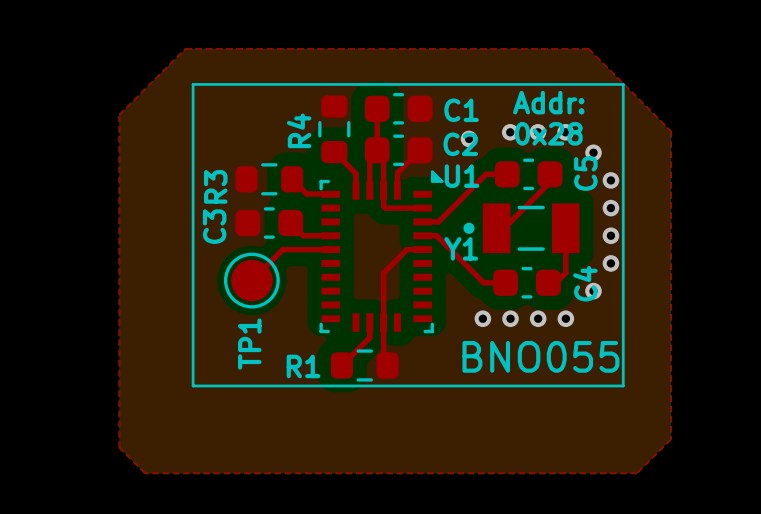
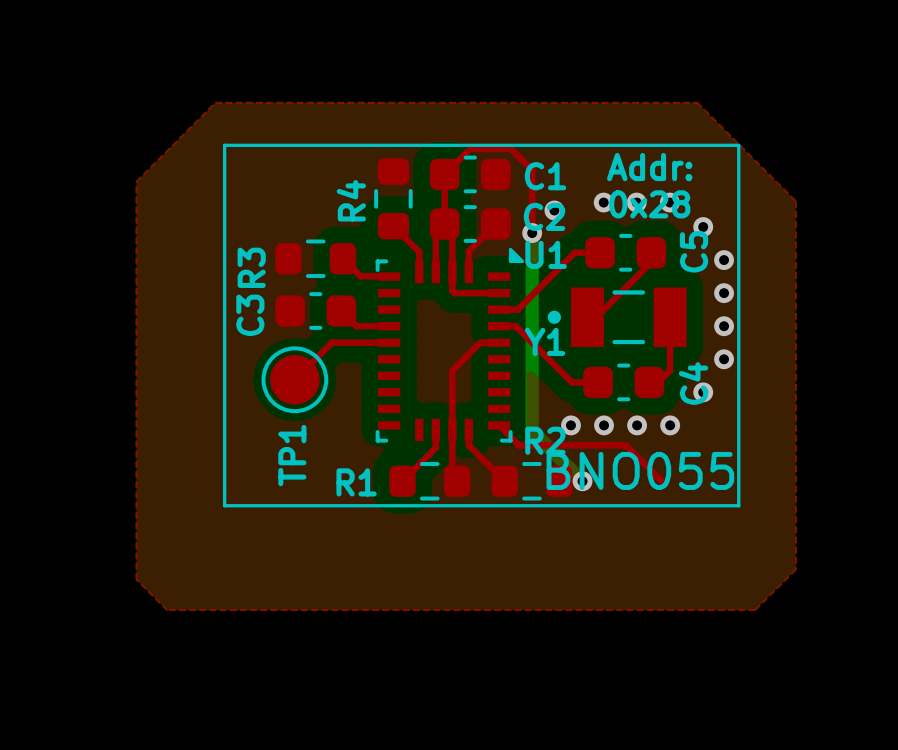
top track: none -> (444, 174) (470, 148) (510, 148) (532, 170) (532, 233)
bottom track: none -> (532, 233) (532, 430) (582, 481)
via: none -> (532, 233)
top track: none -> (499, 425) (518, 445) (625, 445) (661, 480)
top track: none -> (468, 429) (468, 445) (504, 481)
R2: none -> (531, 481)
via: none -> (582, 481)

